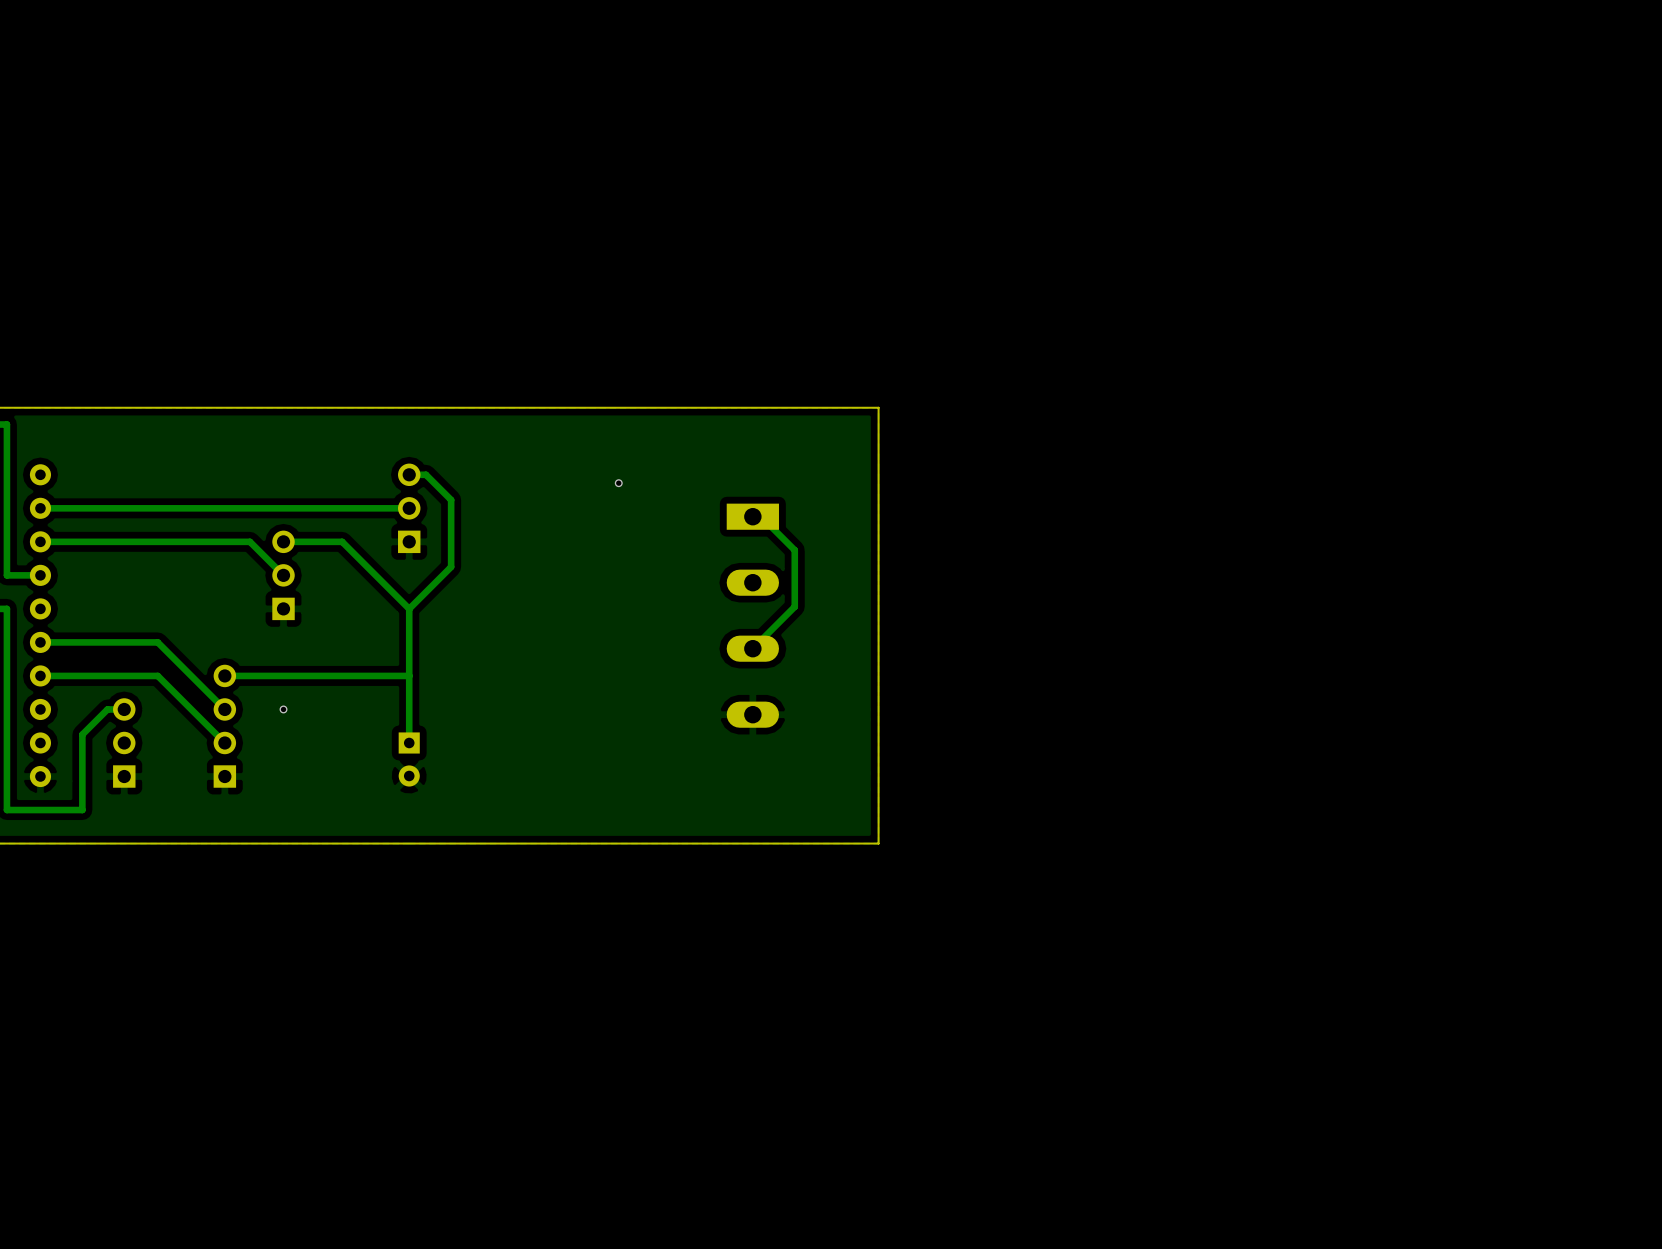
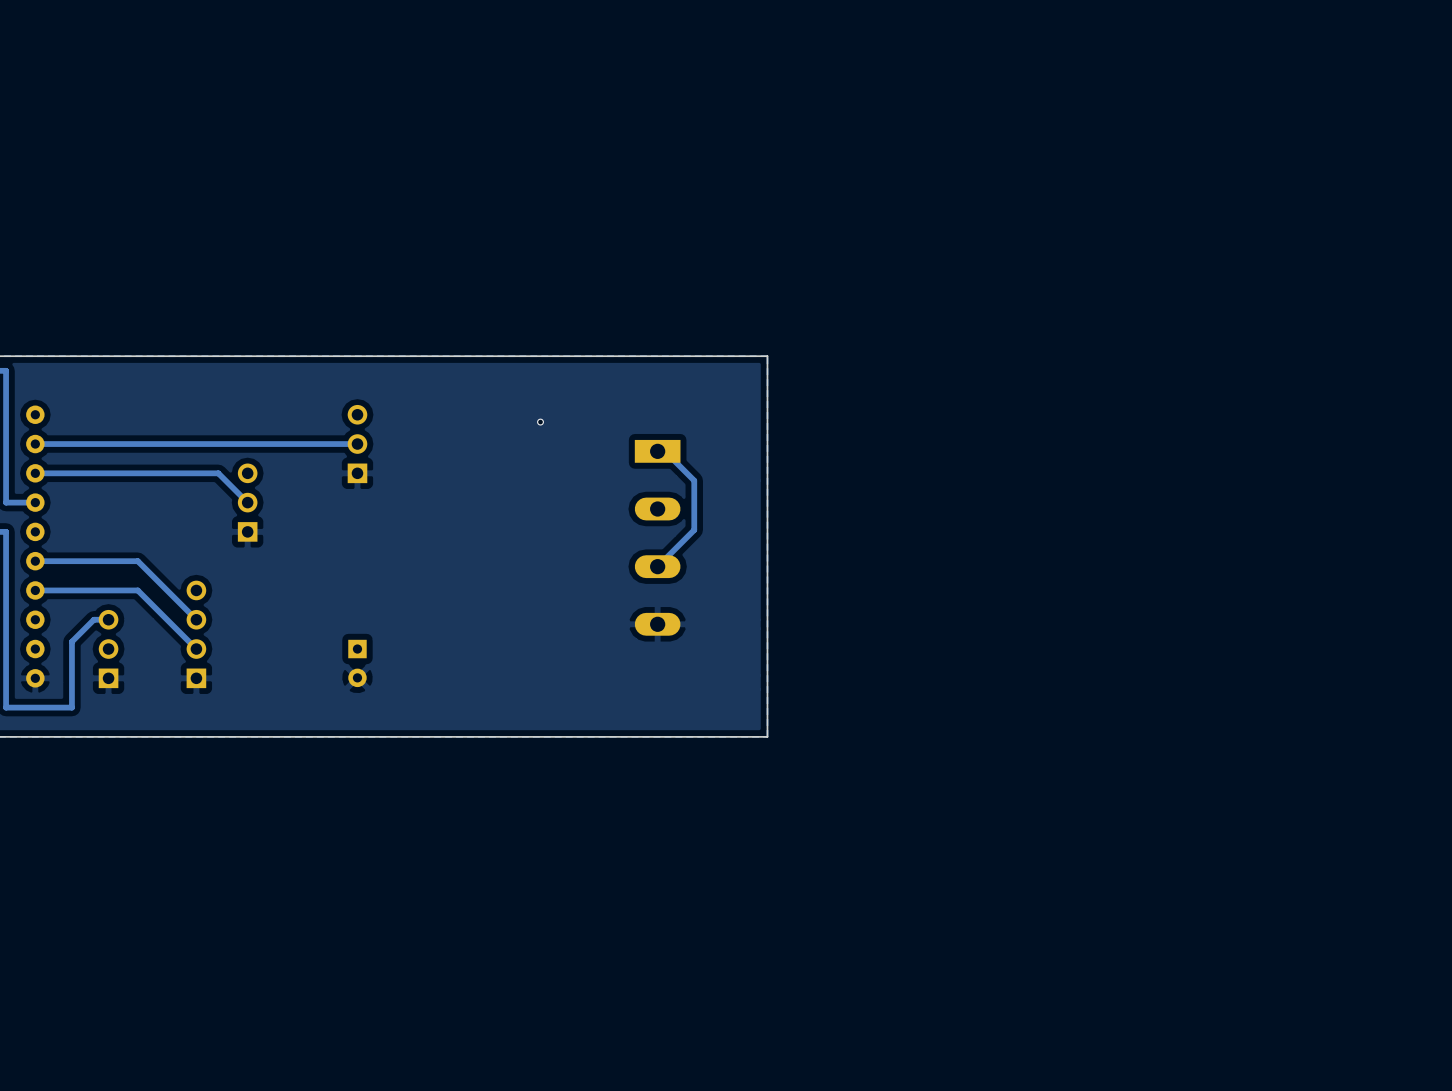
track: (409, 474) (425, 474) (451, 499) (451, 566) (409, 608) -> none
track: (283, 541) (342, 541) (409, 608) -> none
track: (409, 608) (409, 742) -> none
track: (409, 675) (224, 675) -> none
via: (283, 709) -> none

